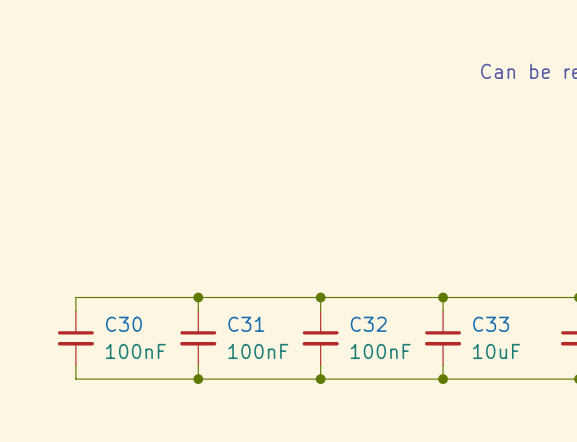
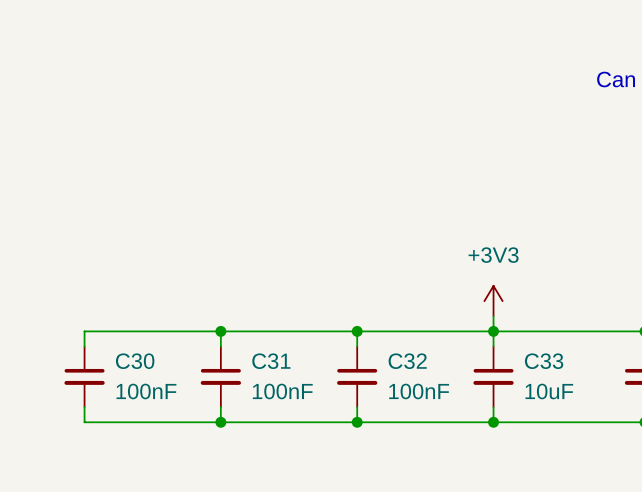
power symbol: none -> +3V3 (493, 301)
wire: none -> (493, 316) (493, 331)

